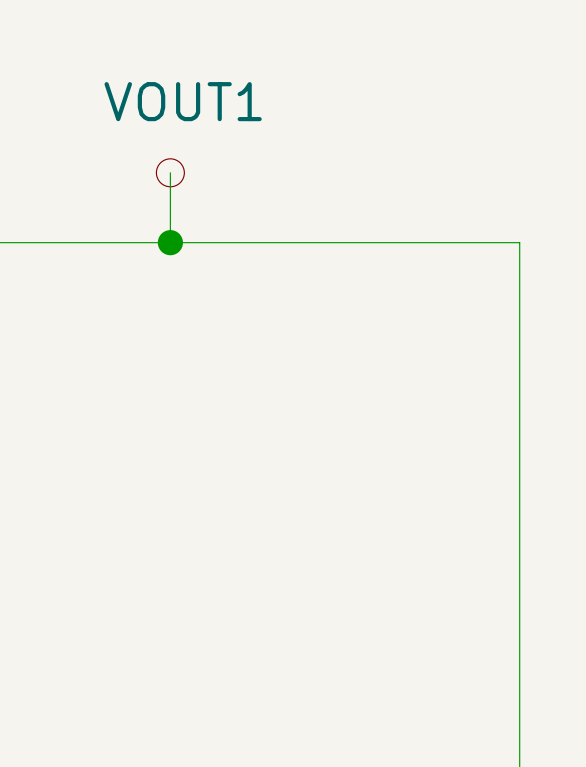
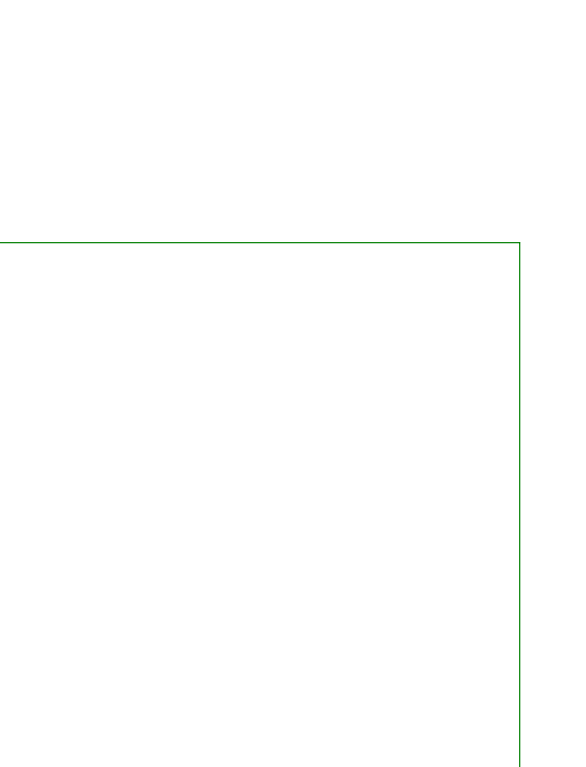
wire: (170, 172) (170, 242) -> none
VOUT1: (170, 172) -> none
junction: (170, 242) -> none

